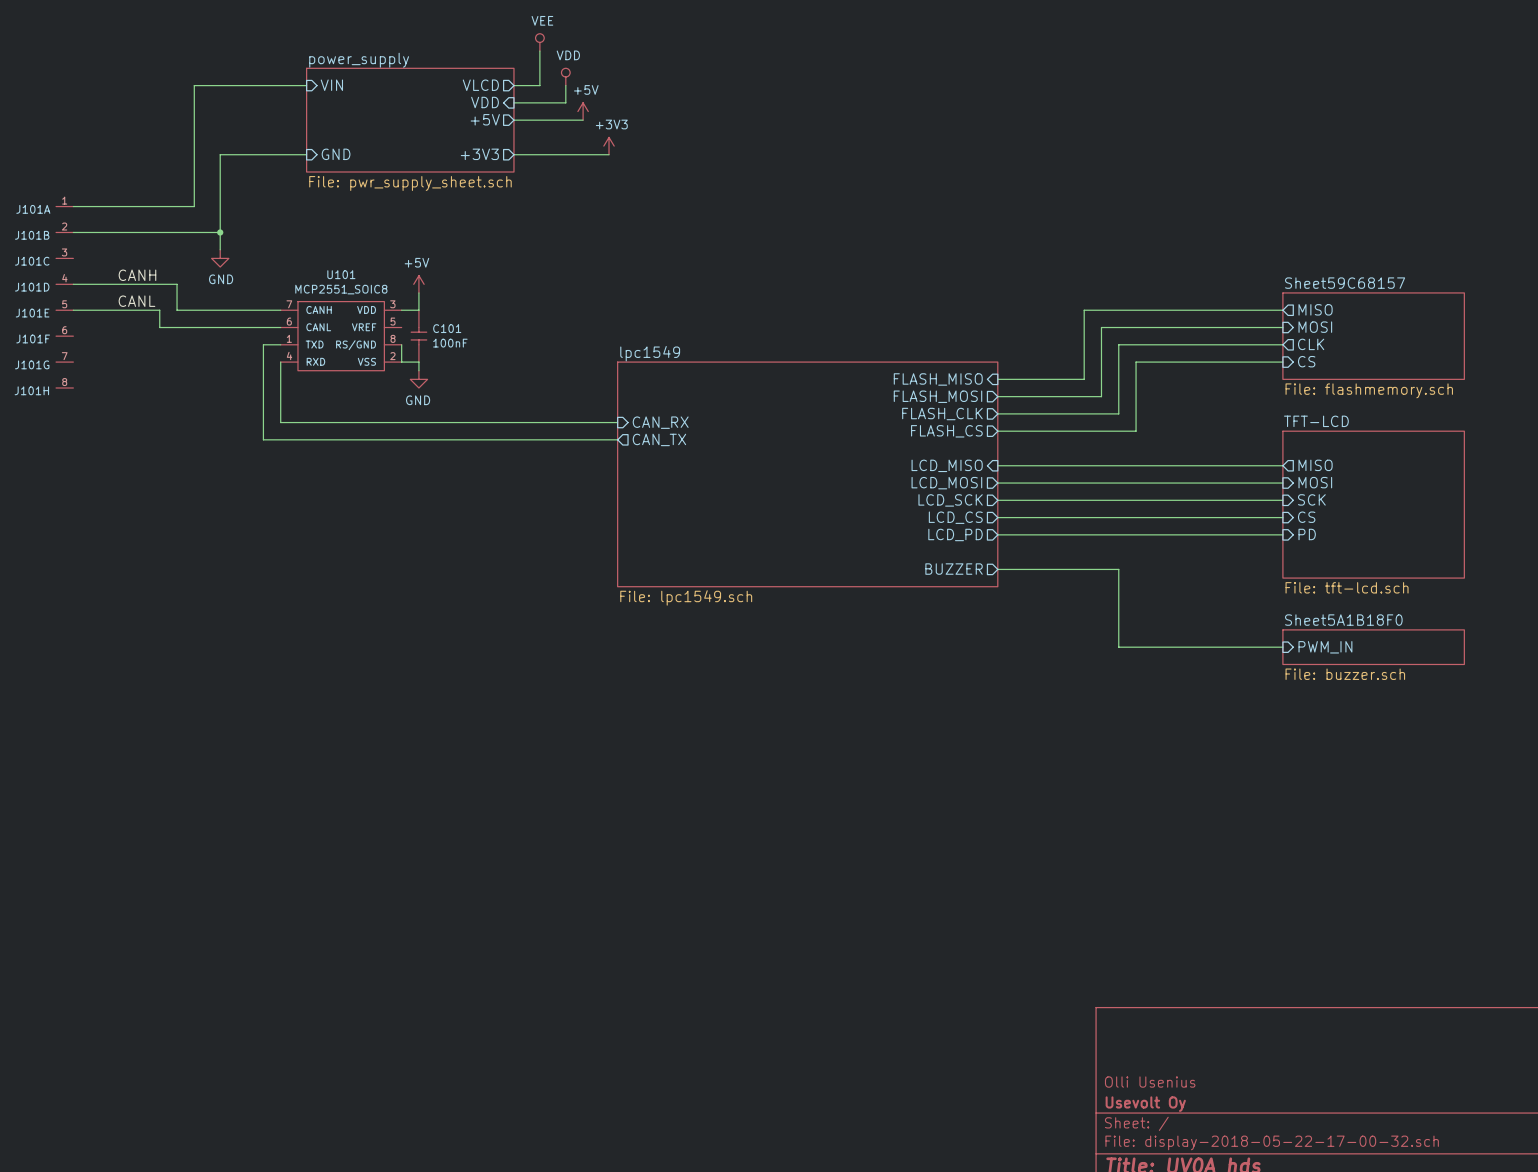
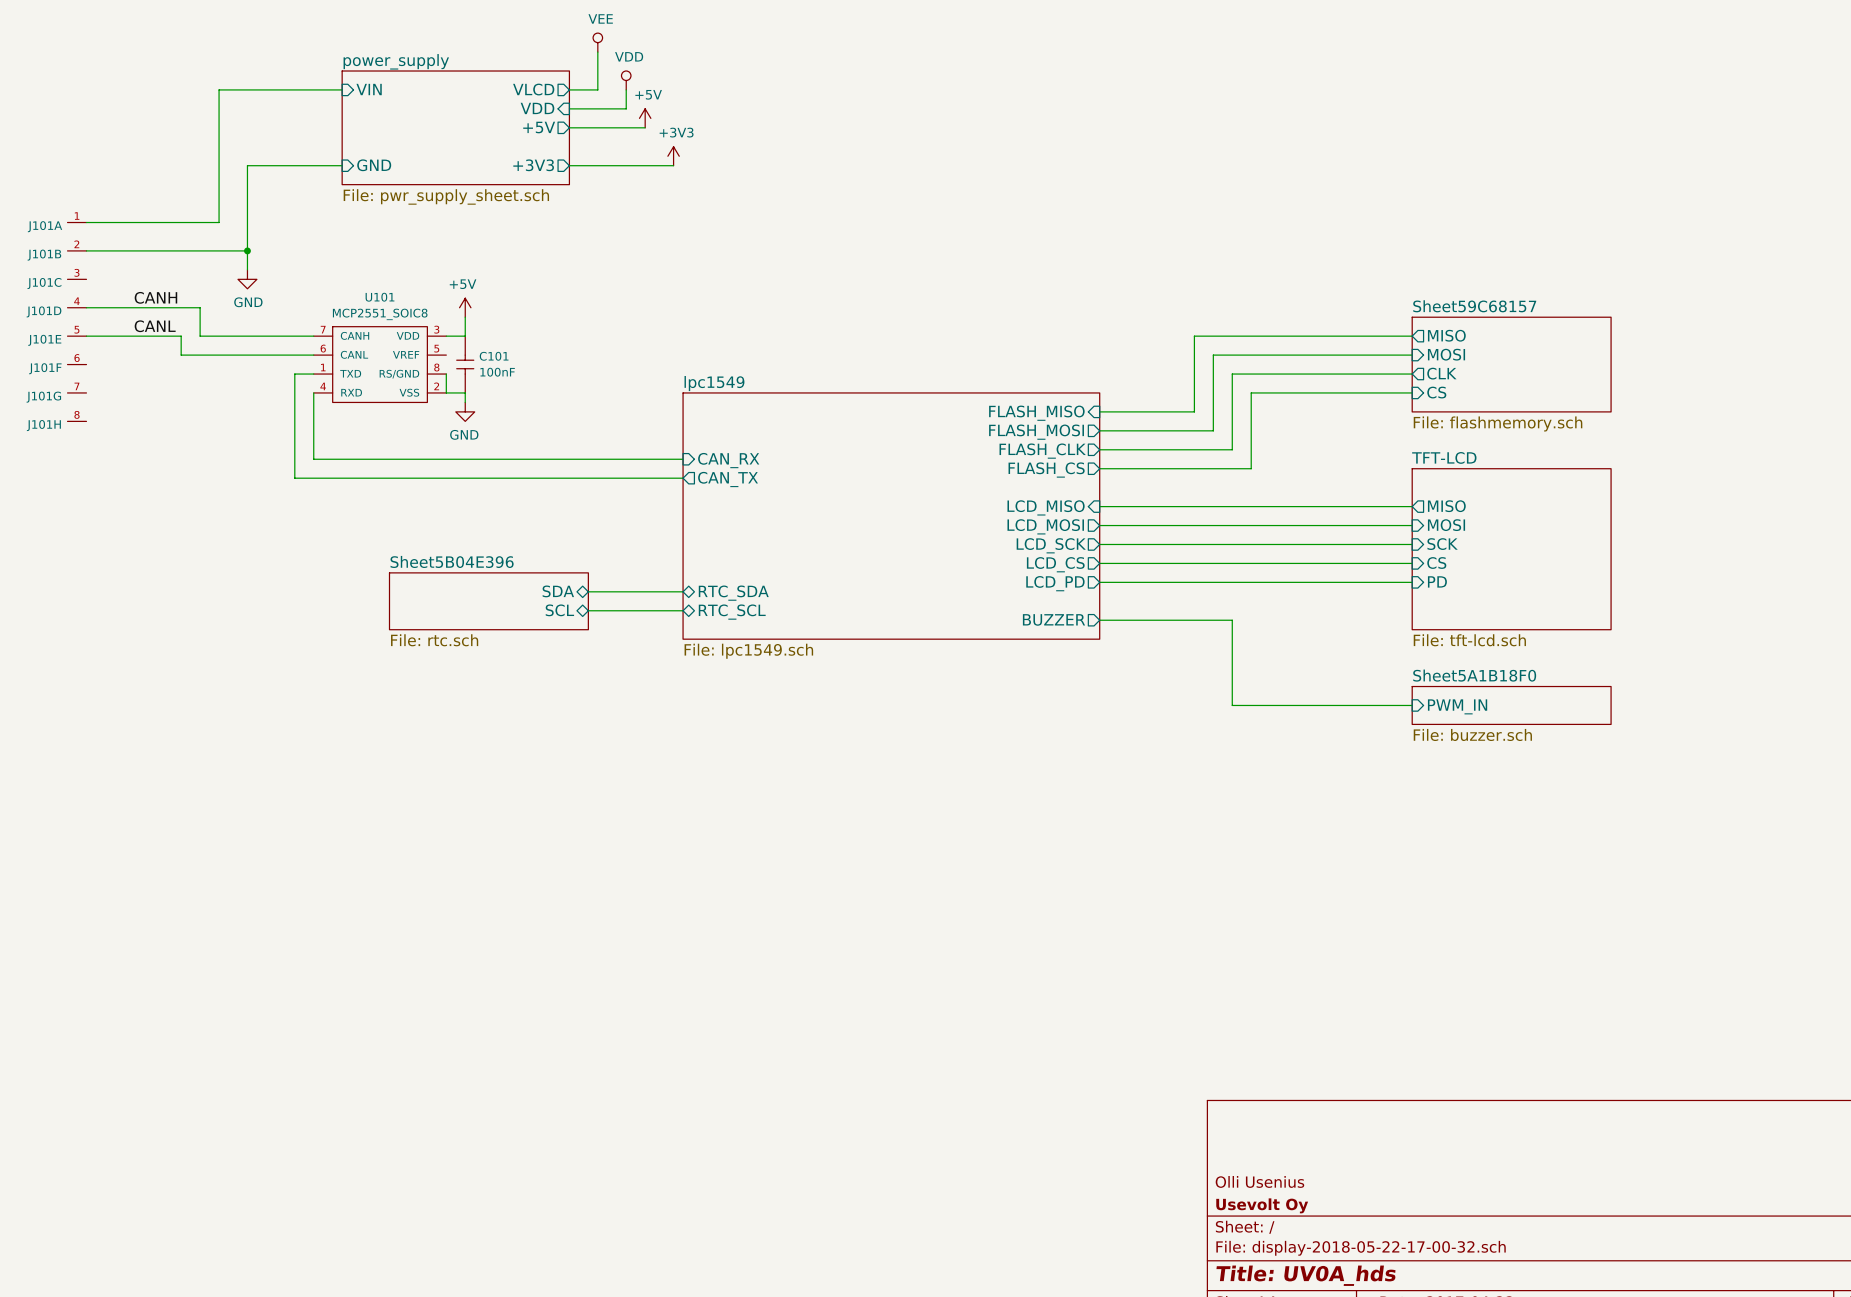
sheet pin: none -> SDA (558, 591)
wire: none -> (588, 591) (683, 591)
sheet pin: none -> RTC_SDA (733, 593)
sheet Sheet5B04E396: none -> File: rtc.sch (488, 601)
sheet pin: none -> SCL (559, 610)
wire: none -> (588, 610) (683, 610)
sheet pin: none -> RTC_SCL (732, 612)

